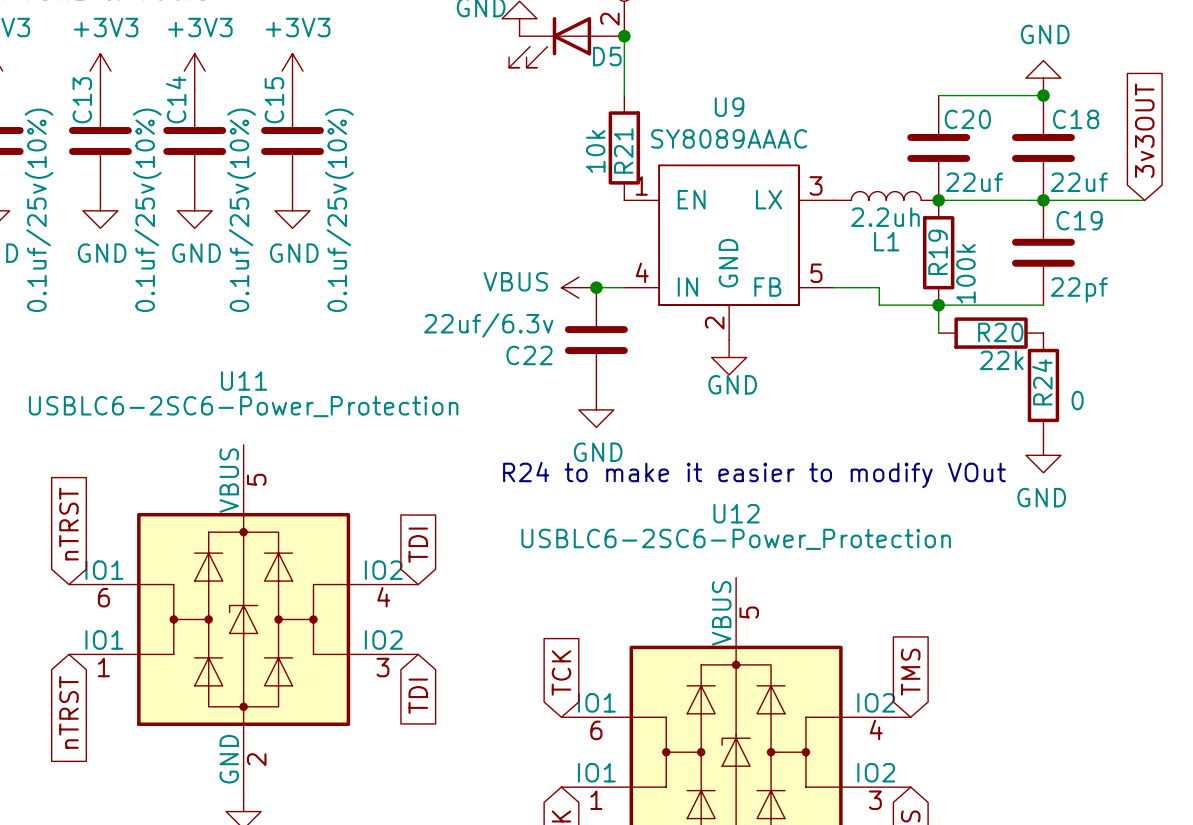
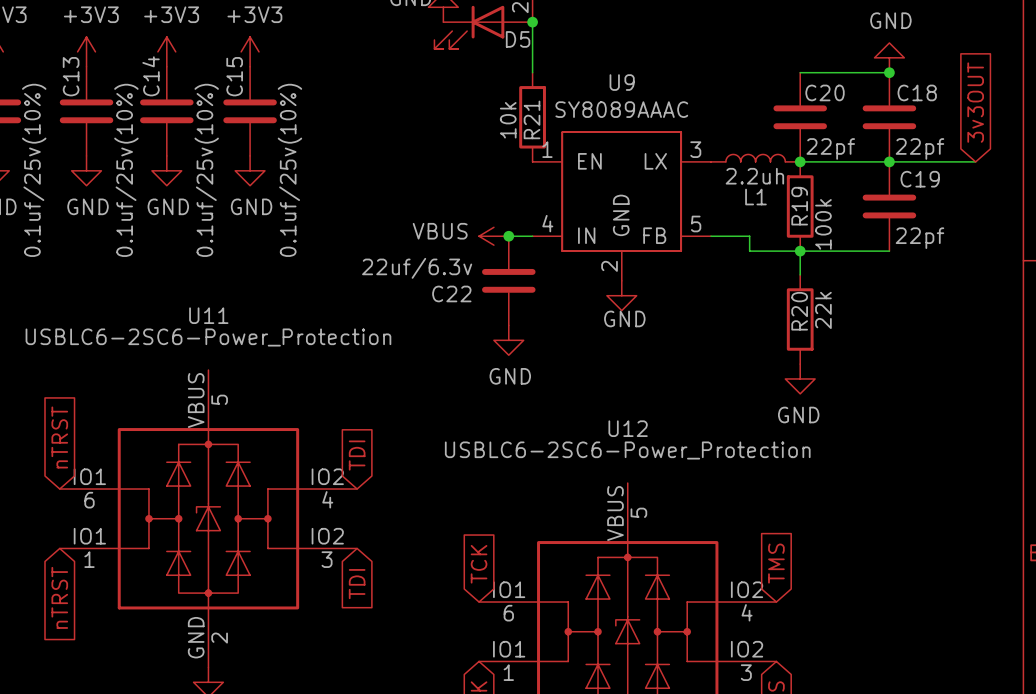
C20 value: 22uf (974, 182) -> 22pf (830, 148)
C18 value: 22uf (1079, 182) -> 22pf (919, 148)
R20 rotation: 0° (991, 333) -> 90° clockwise (800, 319)
R20 position: (991, 333) -> (800, 319)
R20 value position: 22k (1001, 360) -> 22k (823, 310)
R24: 0 (1043, 385) -> none
power symbol position: GND (1043, 455) -> GND (800, 378)
text: R24 to make it easier to modify VOut (754, 474) -> none

